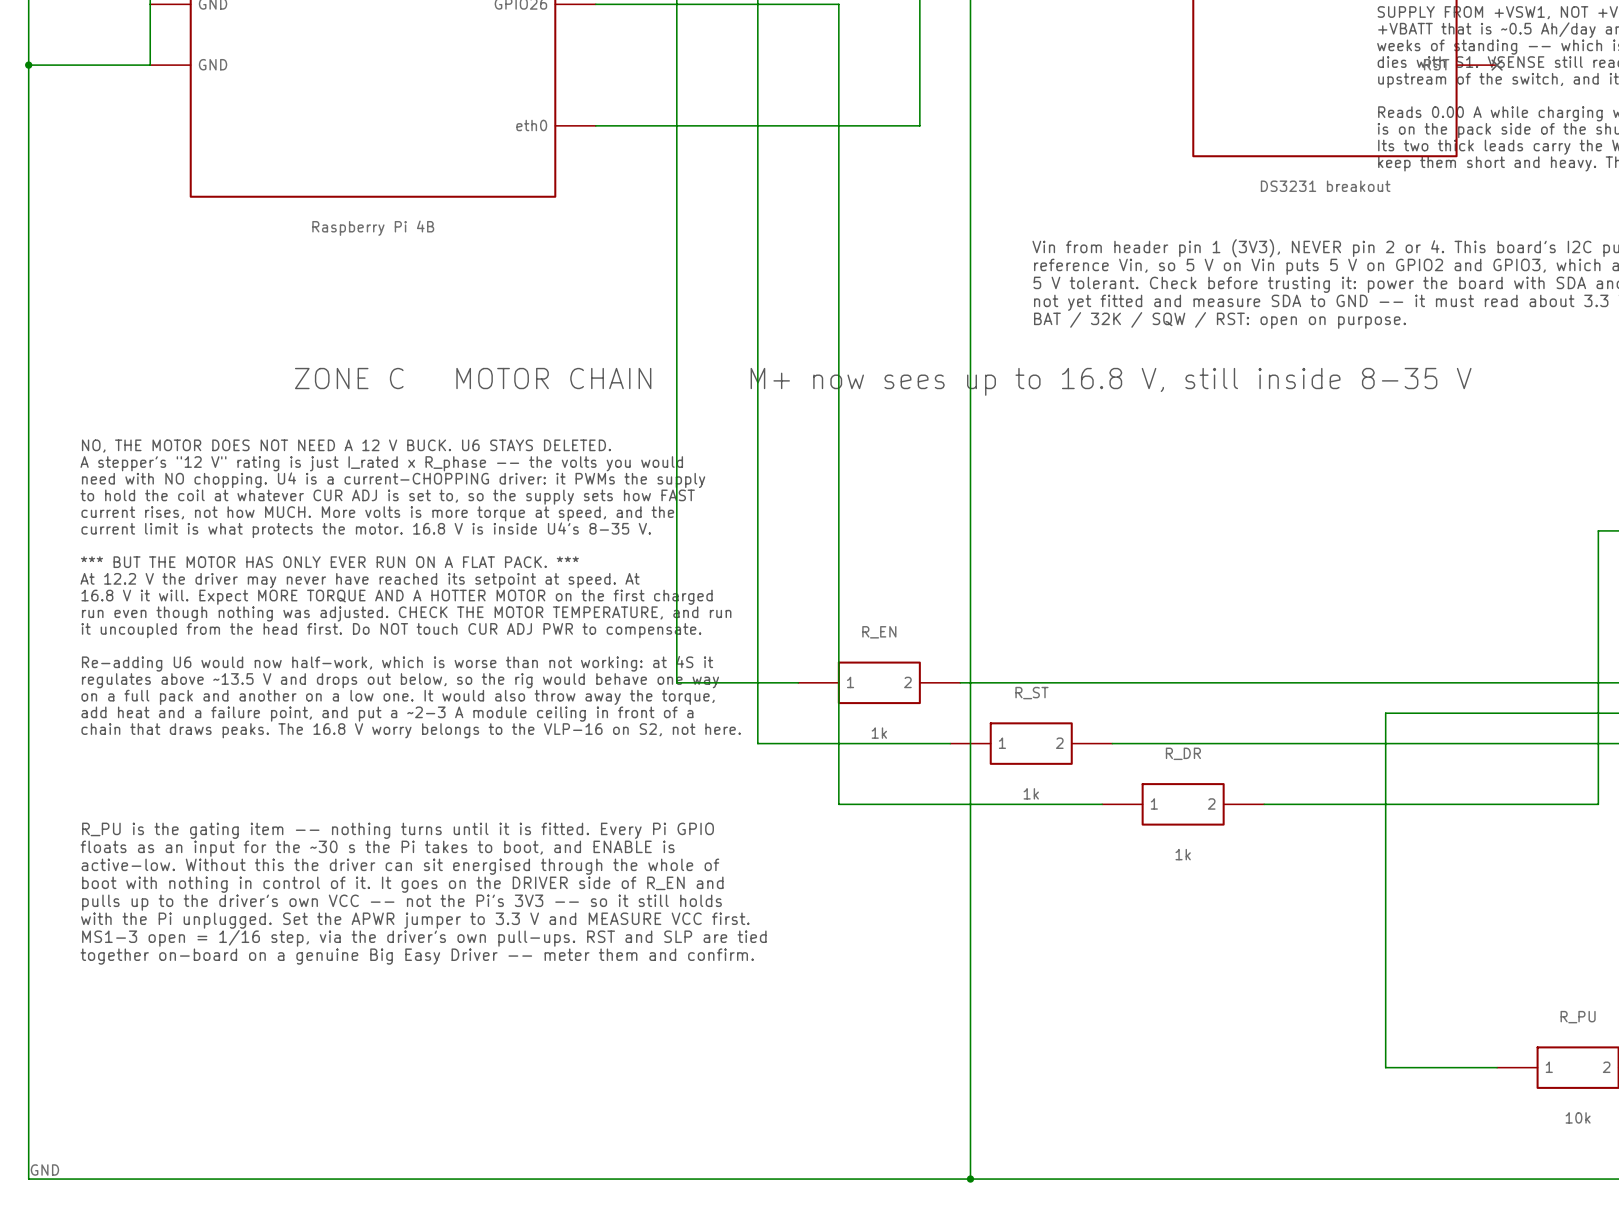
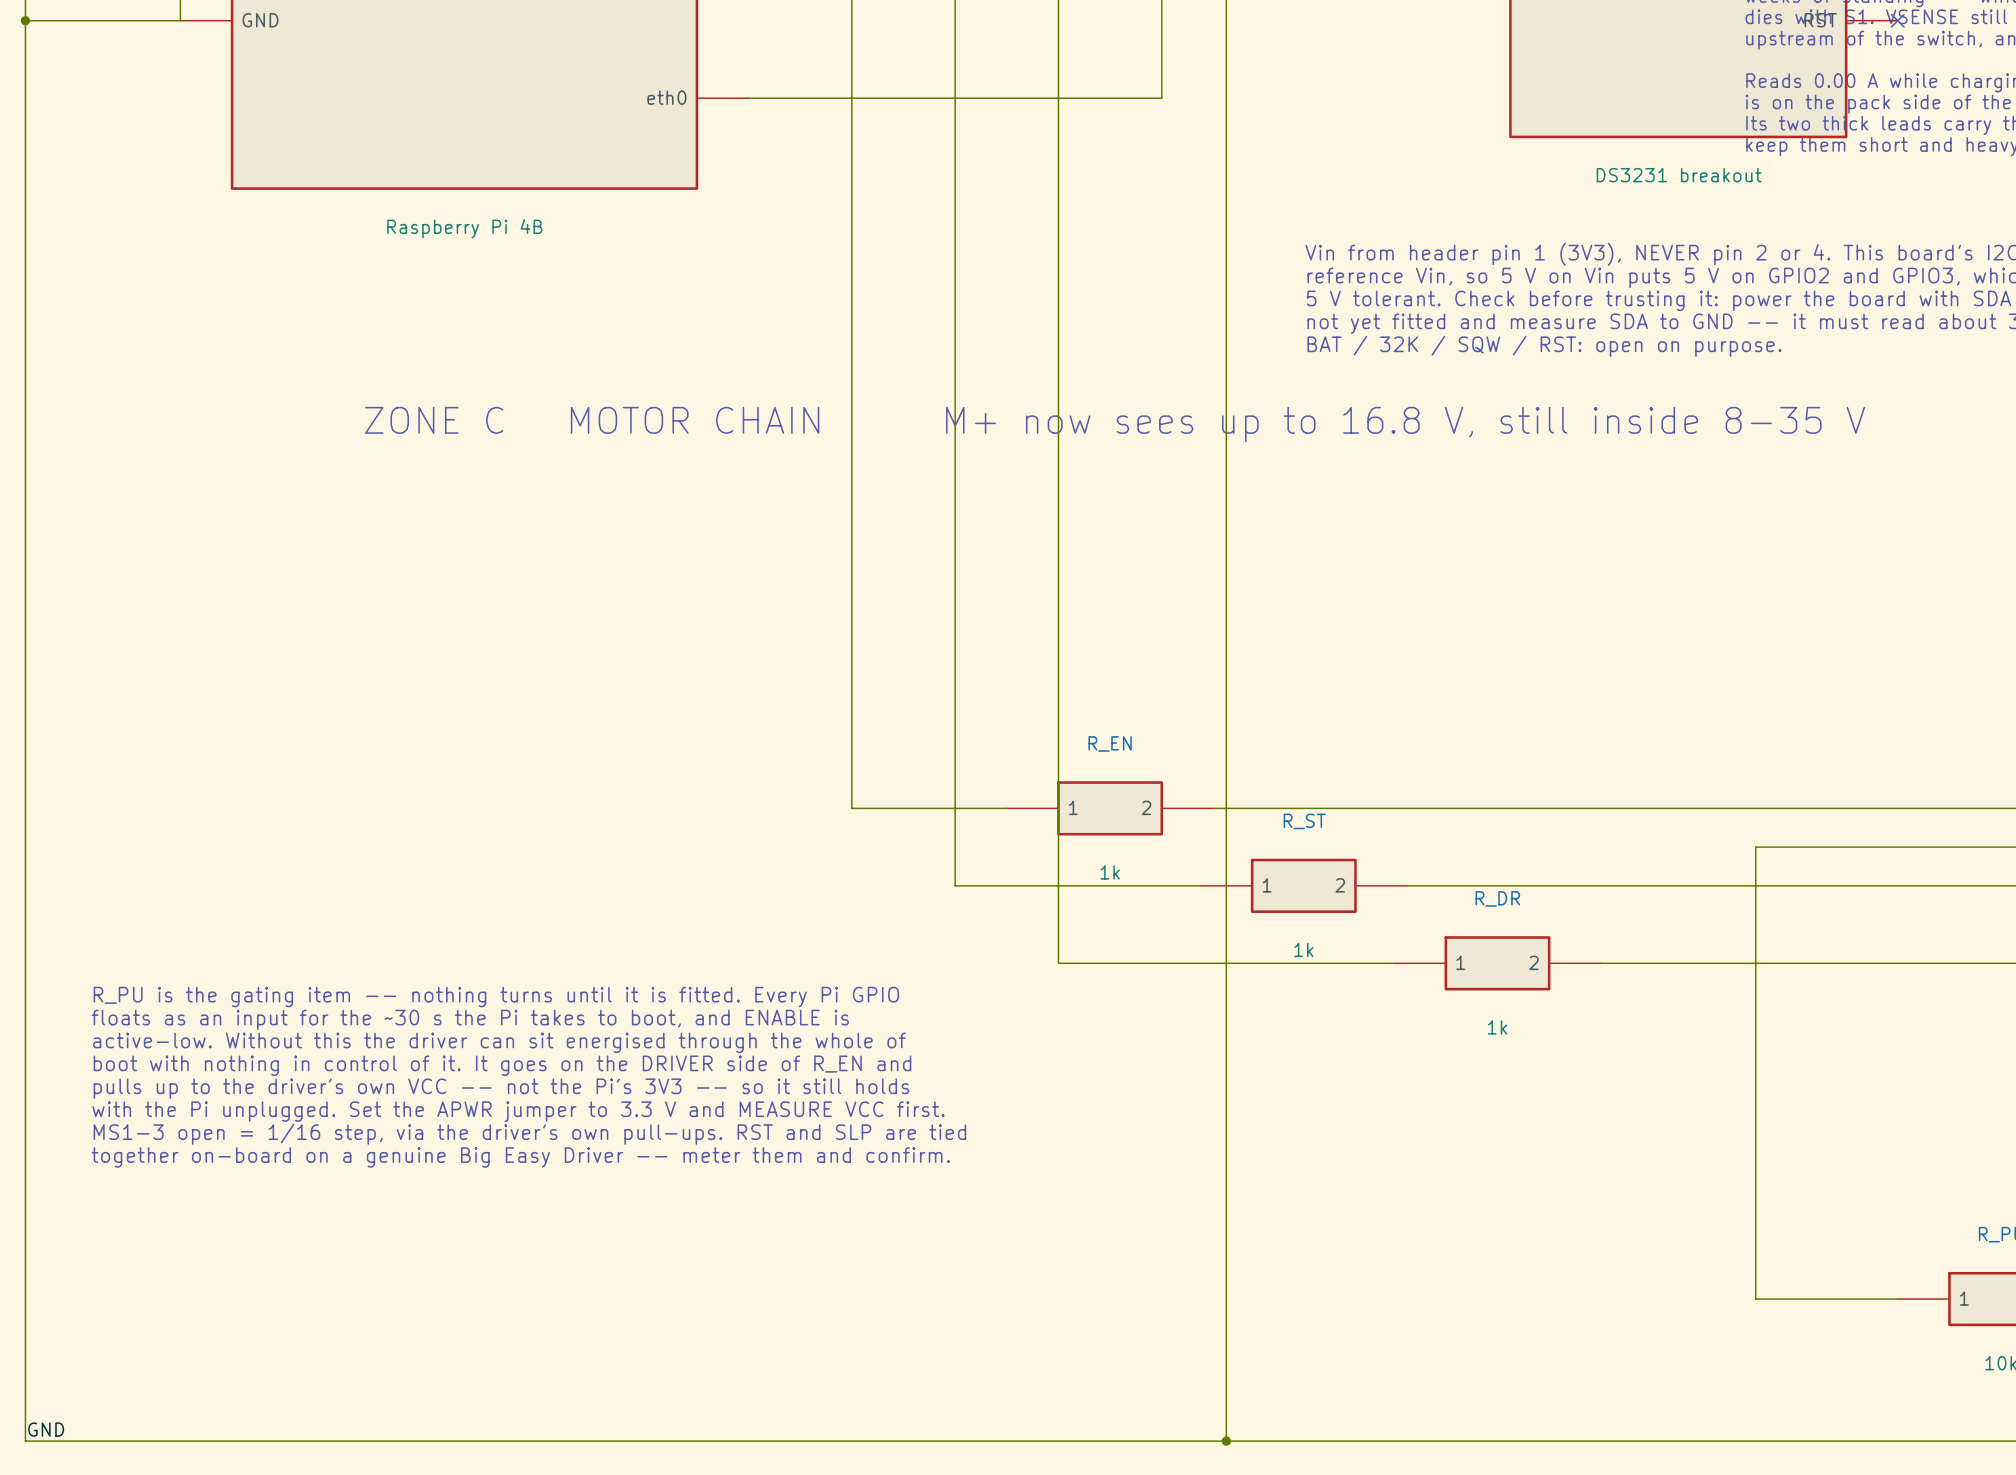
text: NO, THE MOTOR DOES NOT NEED A 12 V BUCK. U6 STAYS DELETED. (346, 446) -> none
text: A stepper's "12 V" rating is just I_rated x R_phase -- the volts you would (381, 463) -> none
text: need with NO chopping. U4 is a current-CHOPPING driver: it PWMs the supply (393, 480) -> none
text: to hold the coil at whatever CUR ADJ is set to, so the supply sets how FAST (387, 497) -> none
text: current rises, not how MUCH. More volts is more torque at speed, and the (377, 513) -> none
text: current limit is what protects the motor. 16.8 V is inside U4's 8-35 V. (366, 530) -> none
text: *** BUT THE MOTOR HAS ONLY EVER RUN ON A FLAT PACK. *** (329, 562) -> none
text: At 12.2 V the driver may never have reached its setpoint at speed. At (360, 580) -> none
text: 16.8 V it will. Expect MORE TORQUE AND A HOTTER MOTOR on the first charged (397, 597) -> none
text: run even though nothing was adjusted. CHECK THE MOTOR TEMPERATURE, and run (406, 613) -> none
text: it uncoupled from the head first. Do NOT touch CUR ADJ PWR to compensate. (391, 630) -> none
text: Re-adding U6 would now half-work, which is worse than not working: at 4S it (397, 663) -> none
text: regulates above ~13.5 V and drops out below, so the rig would behave one way (400, 680) -> none
text: on a full pack and another on a low one. It would also throw away the torque, (398, 697) -> none
text: add heat and a failure point, and put a ~2-3 A module ceiling in front of a (387, 714) -> none
text: chain that draws peaks. The 16.8 V worry belongs to the VLP-16 on S2, not here. (411, 730) -> none

